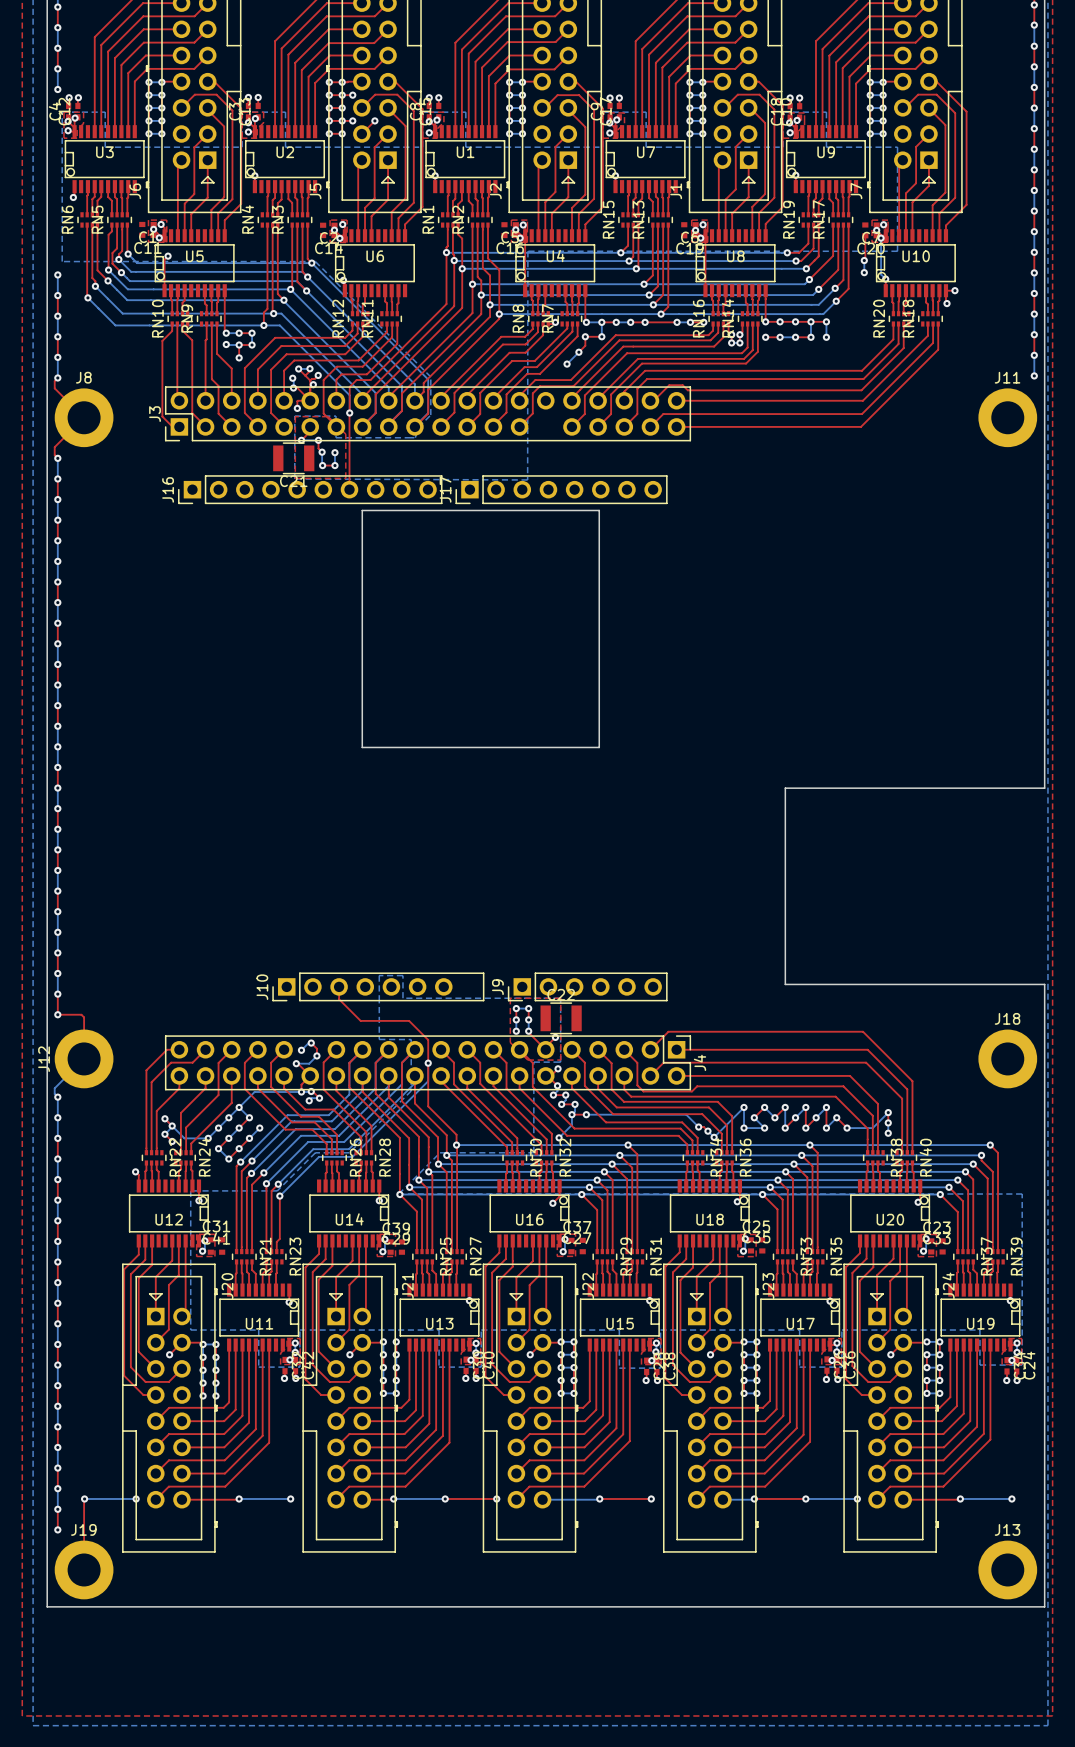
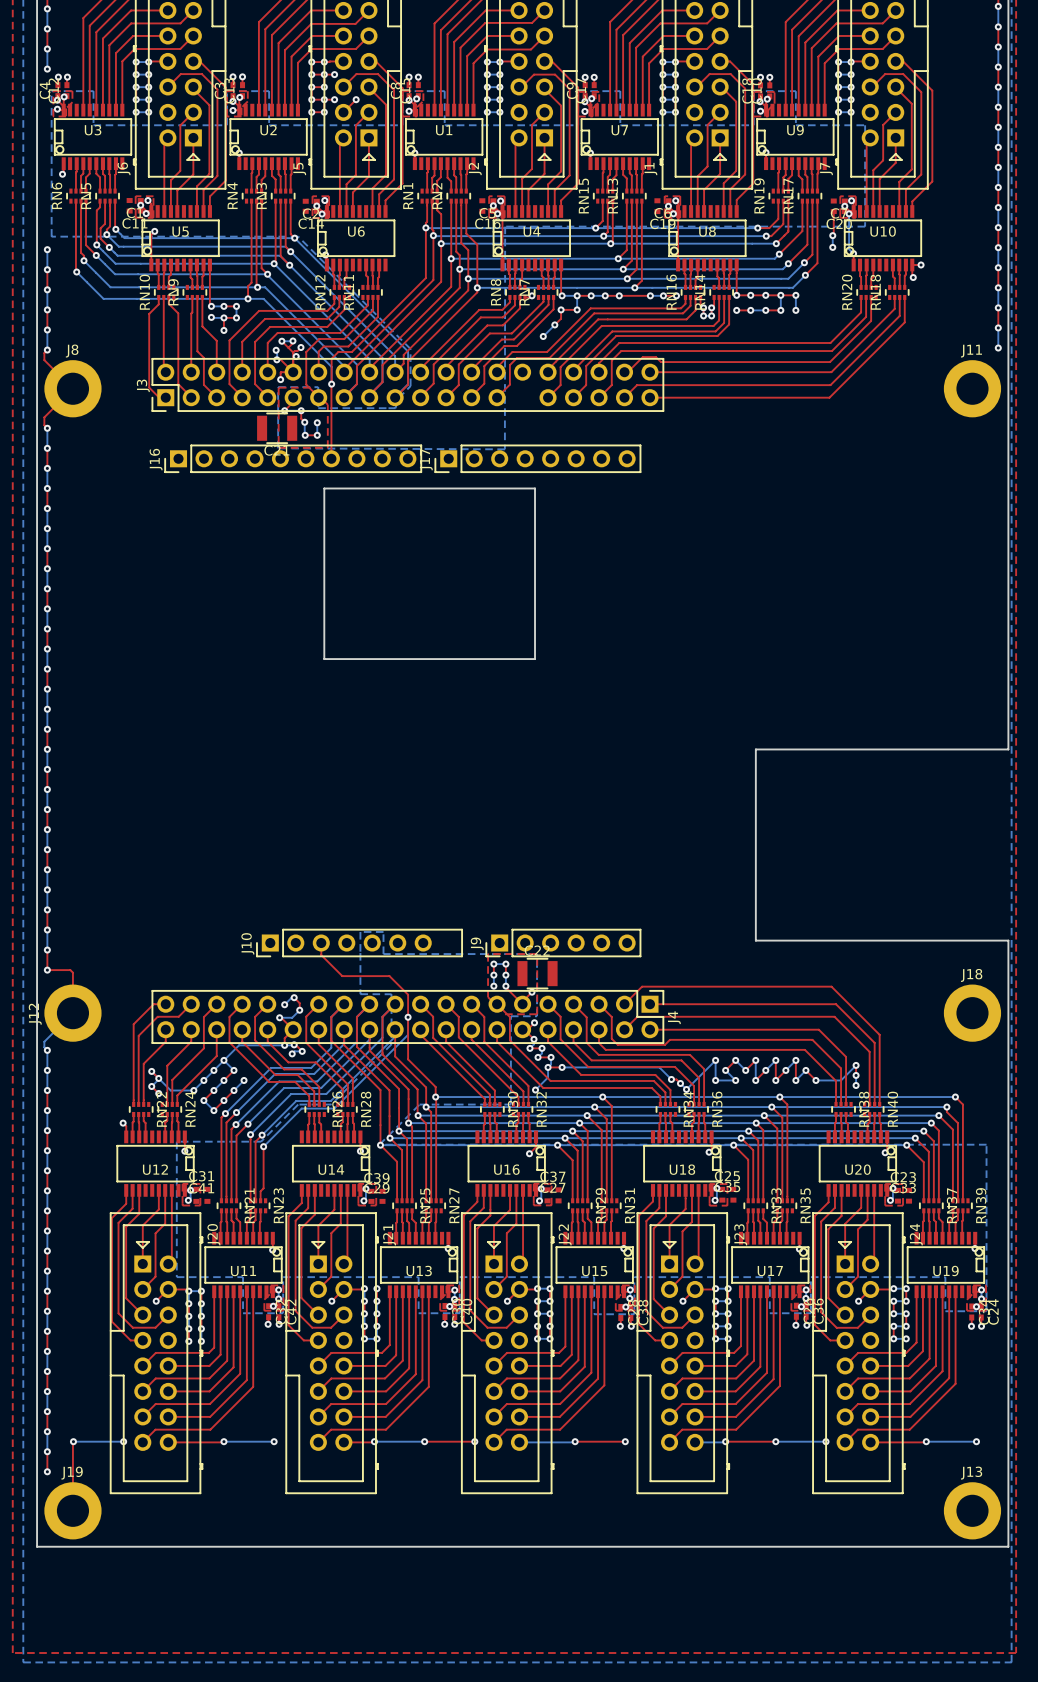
board edge: (362, 510) (362, 747) (599, 747) (599, 510) (362, 510) -> (324, 488) (324, 659) (535, 659) (535, 488) (324, 488)

